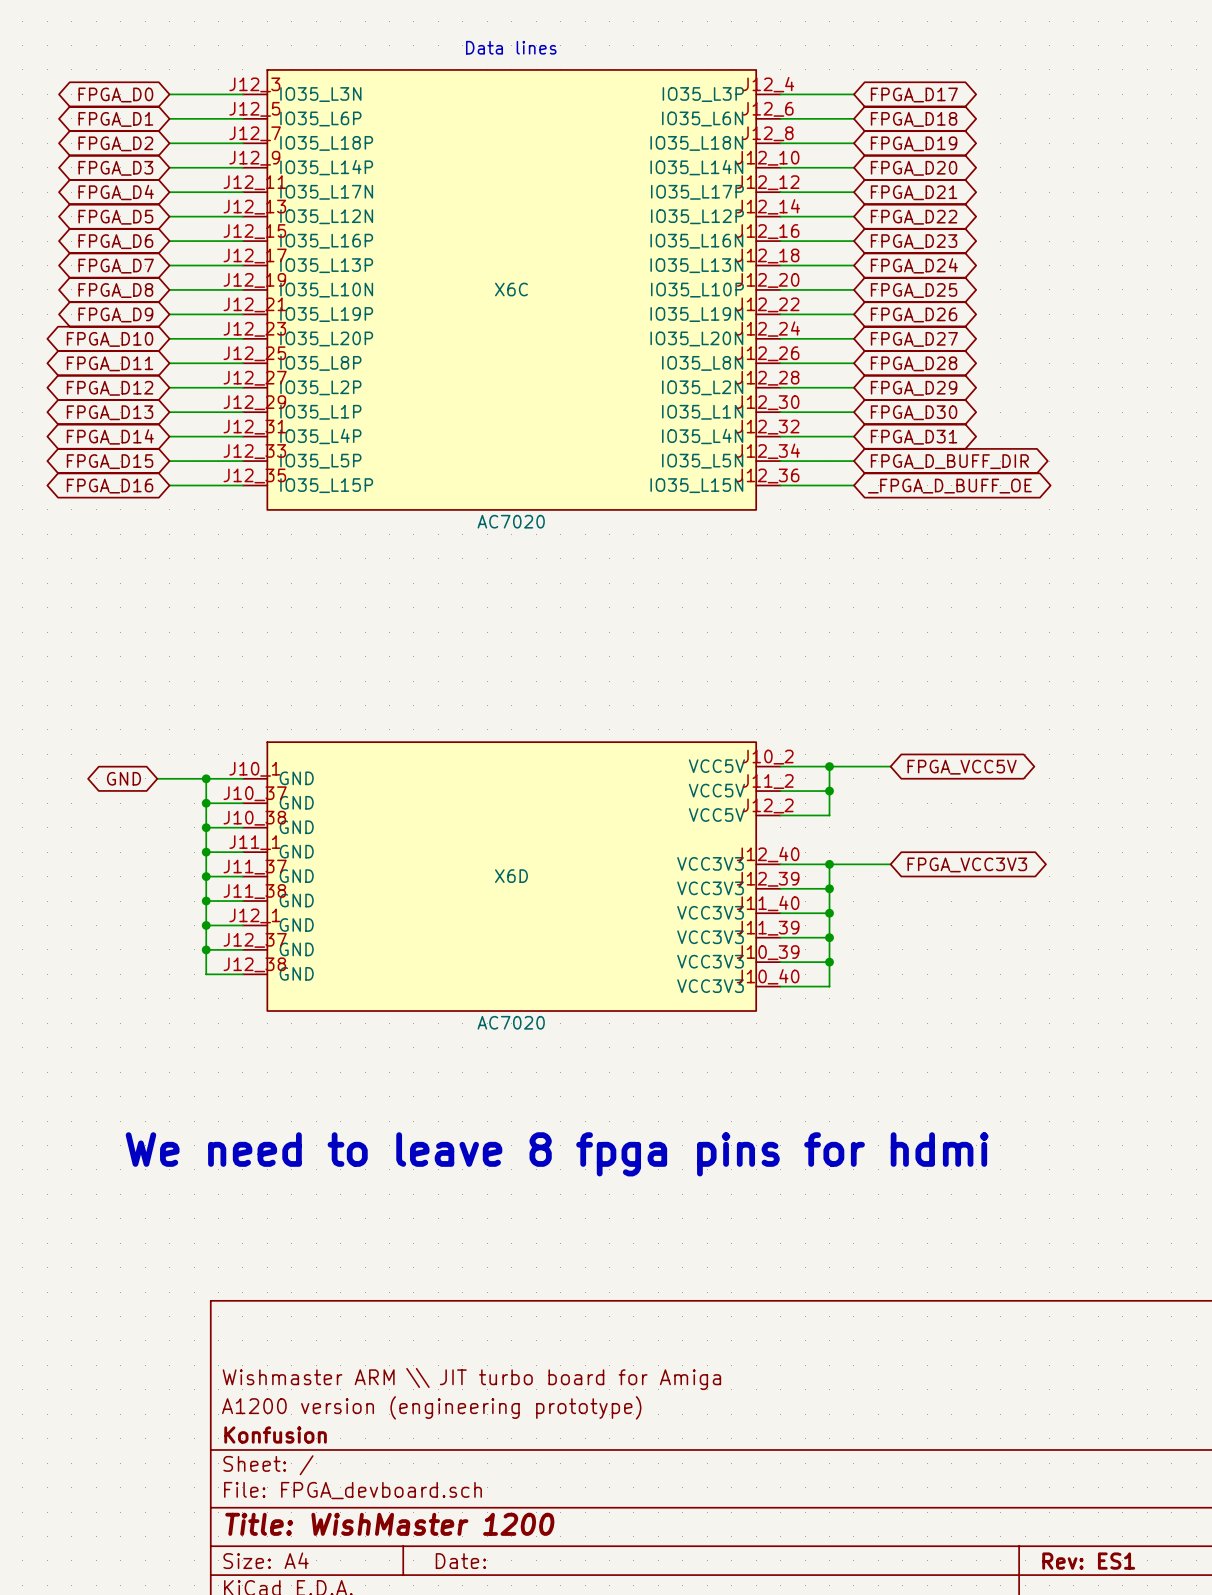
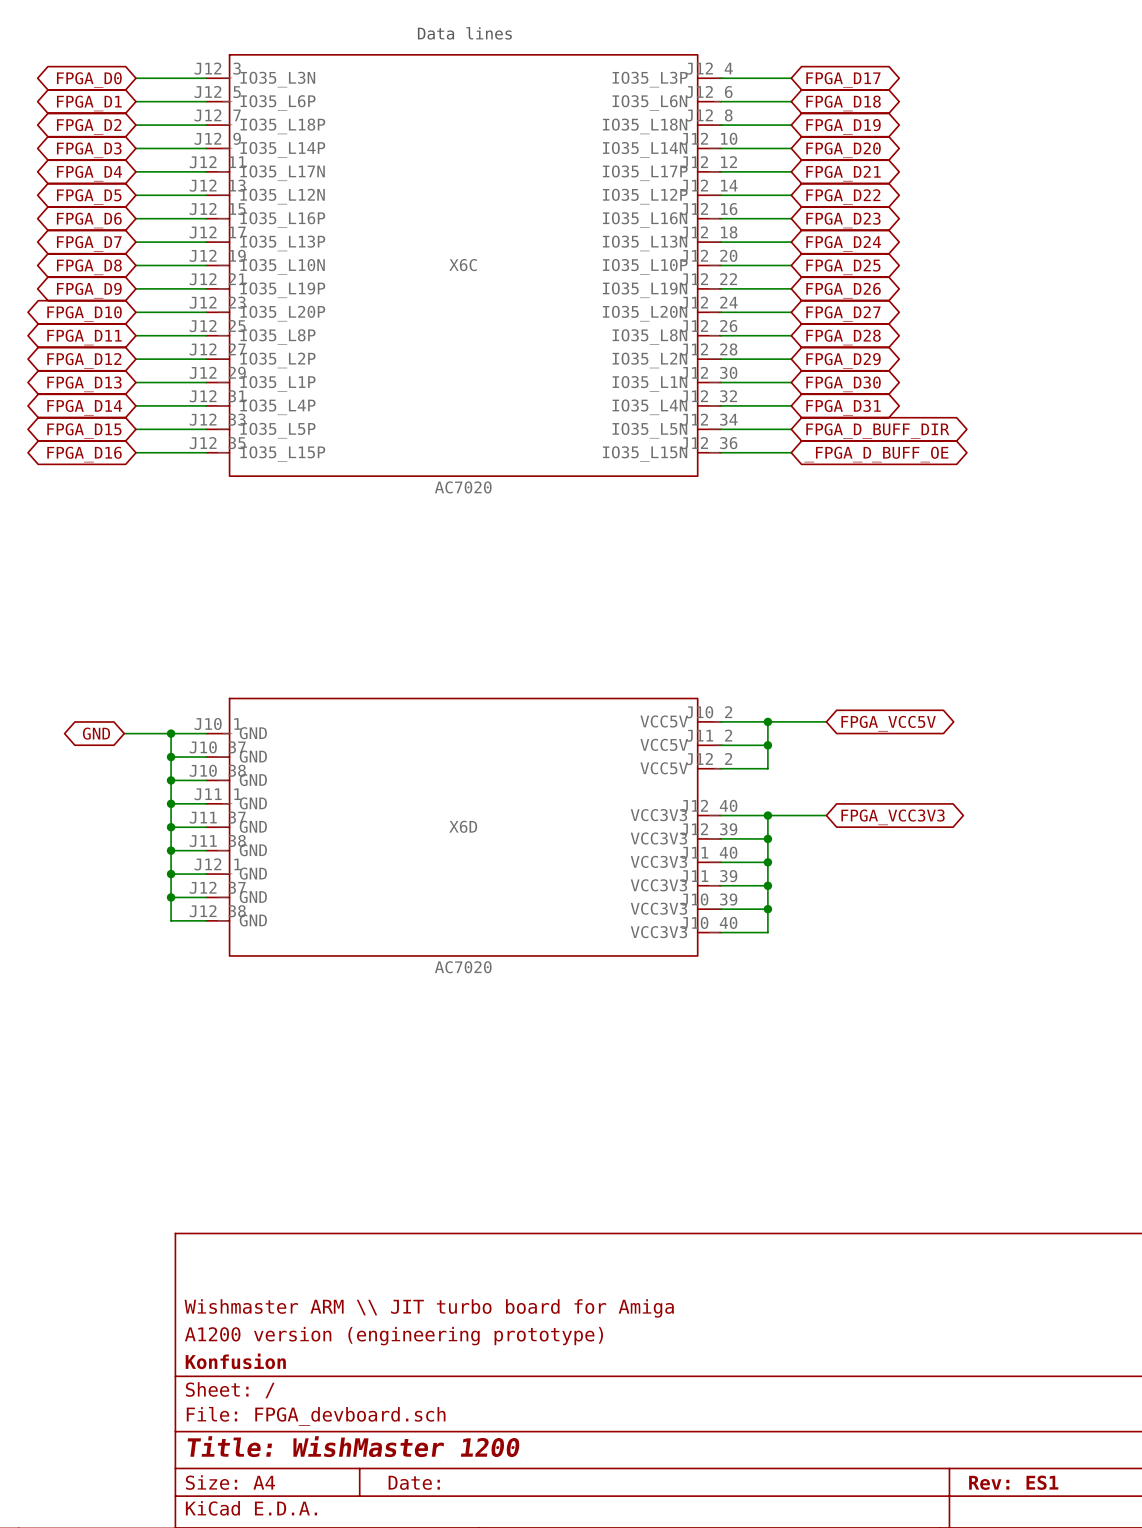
text: We need to leave 8 fpga pins for hdmi (557, 1154) -> none

